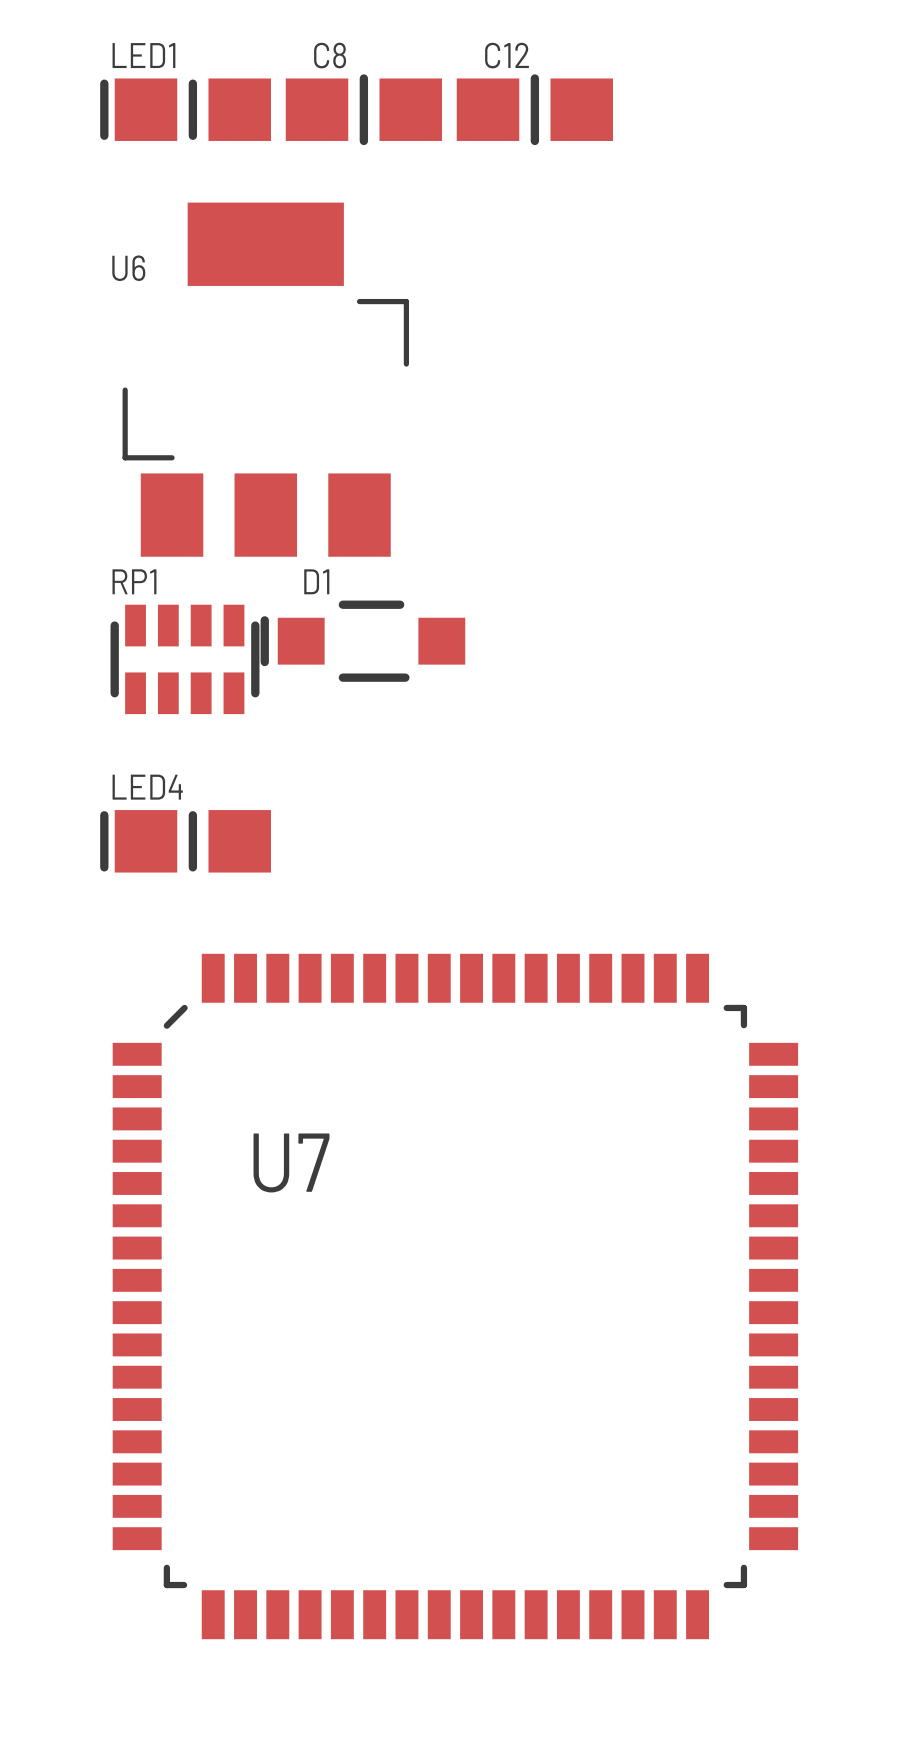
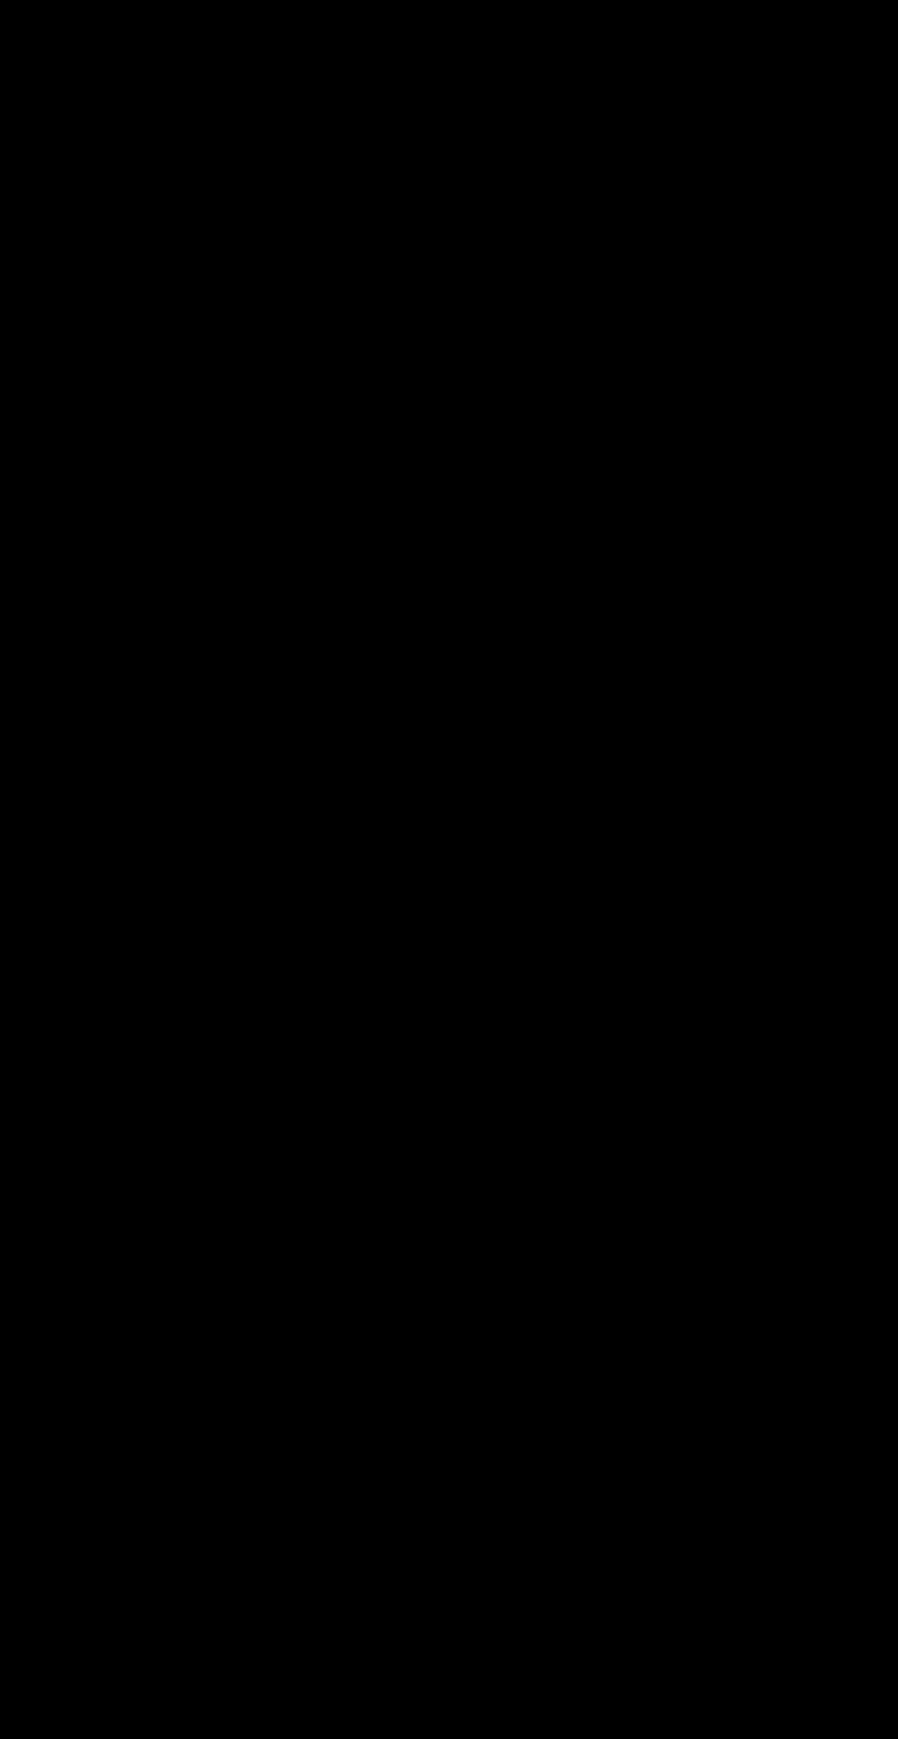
LED1: (185, 109) -> none
C8: (363, 109) -> none
C12: (534, 109) -> none
U6: (265, 379) -> none
D1: (362, 641) -> none
RP1: (185, 659) -> none
LED4: (185, 841) -> none
U7: (455, 1296) -> none

